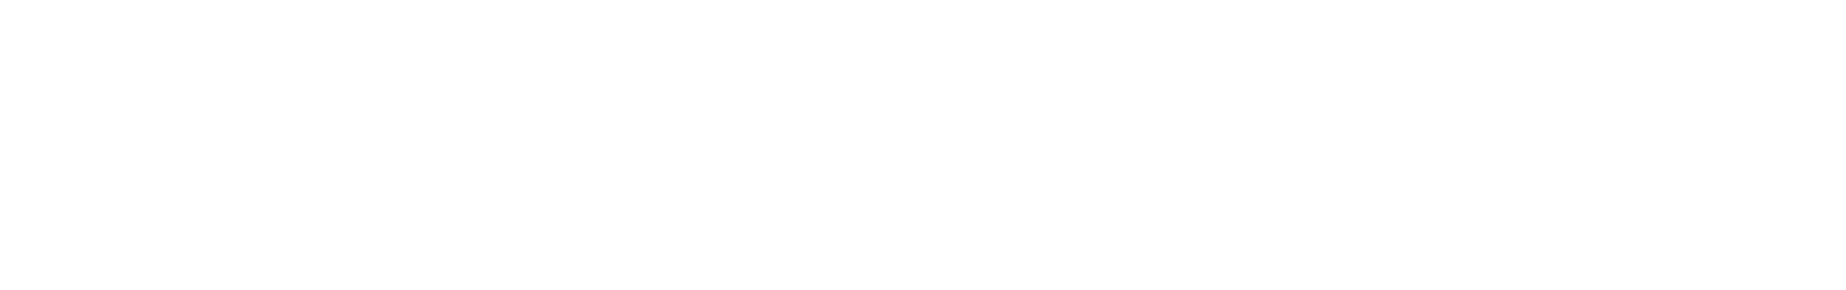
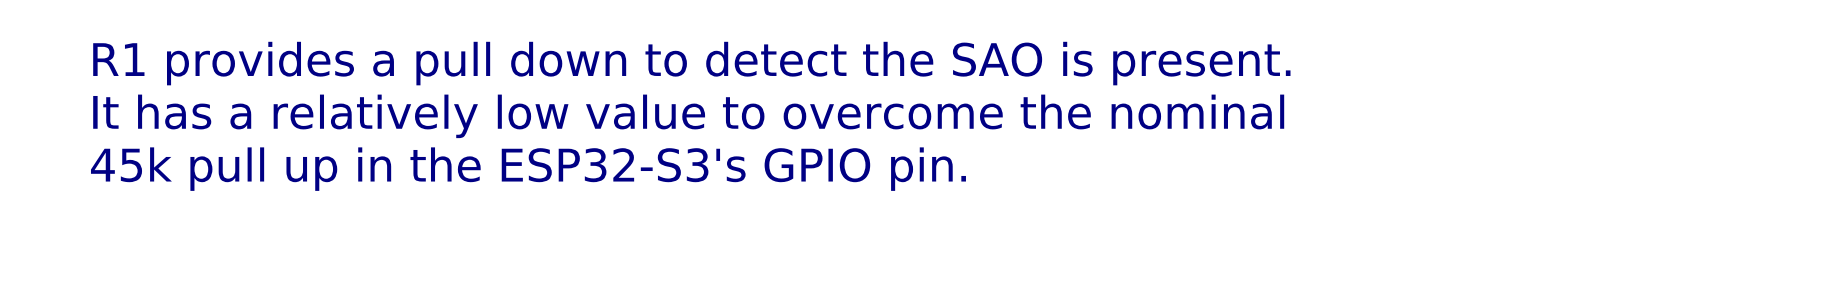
text: none -> R1 provides a pull down to detect the SAO is present. (691, 63)
text: none -> It has a relatively low value to overcome the nominal (688, 116)
text: none -> 45k pull up in the ESP32-S3's GPIO pin. (528, 169)

